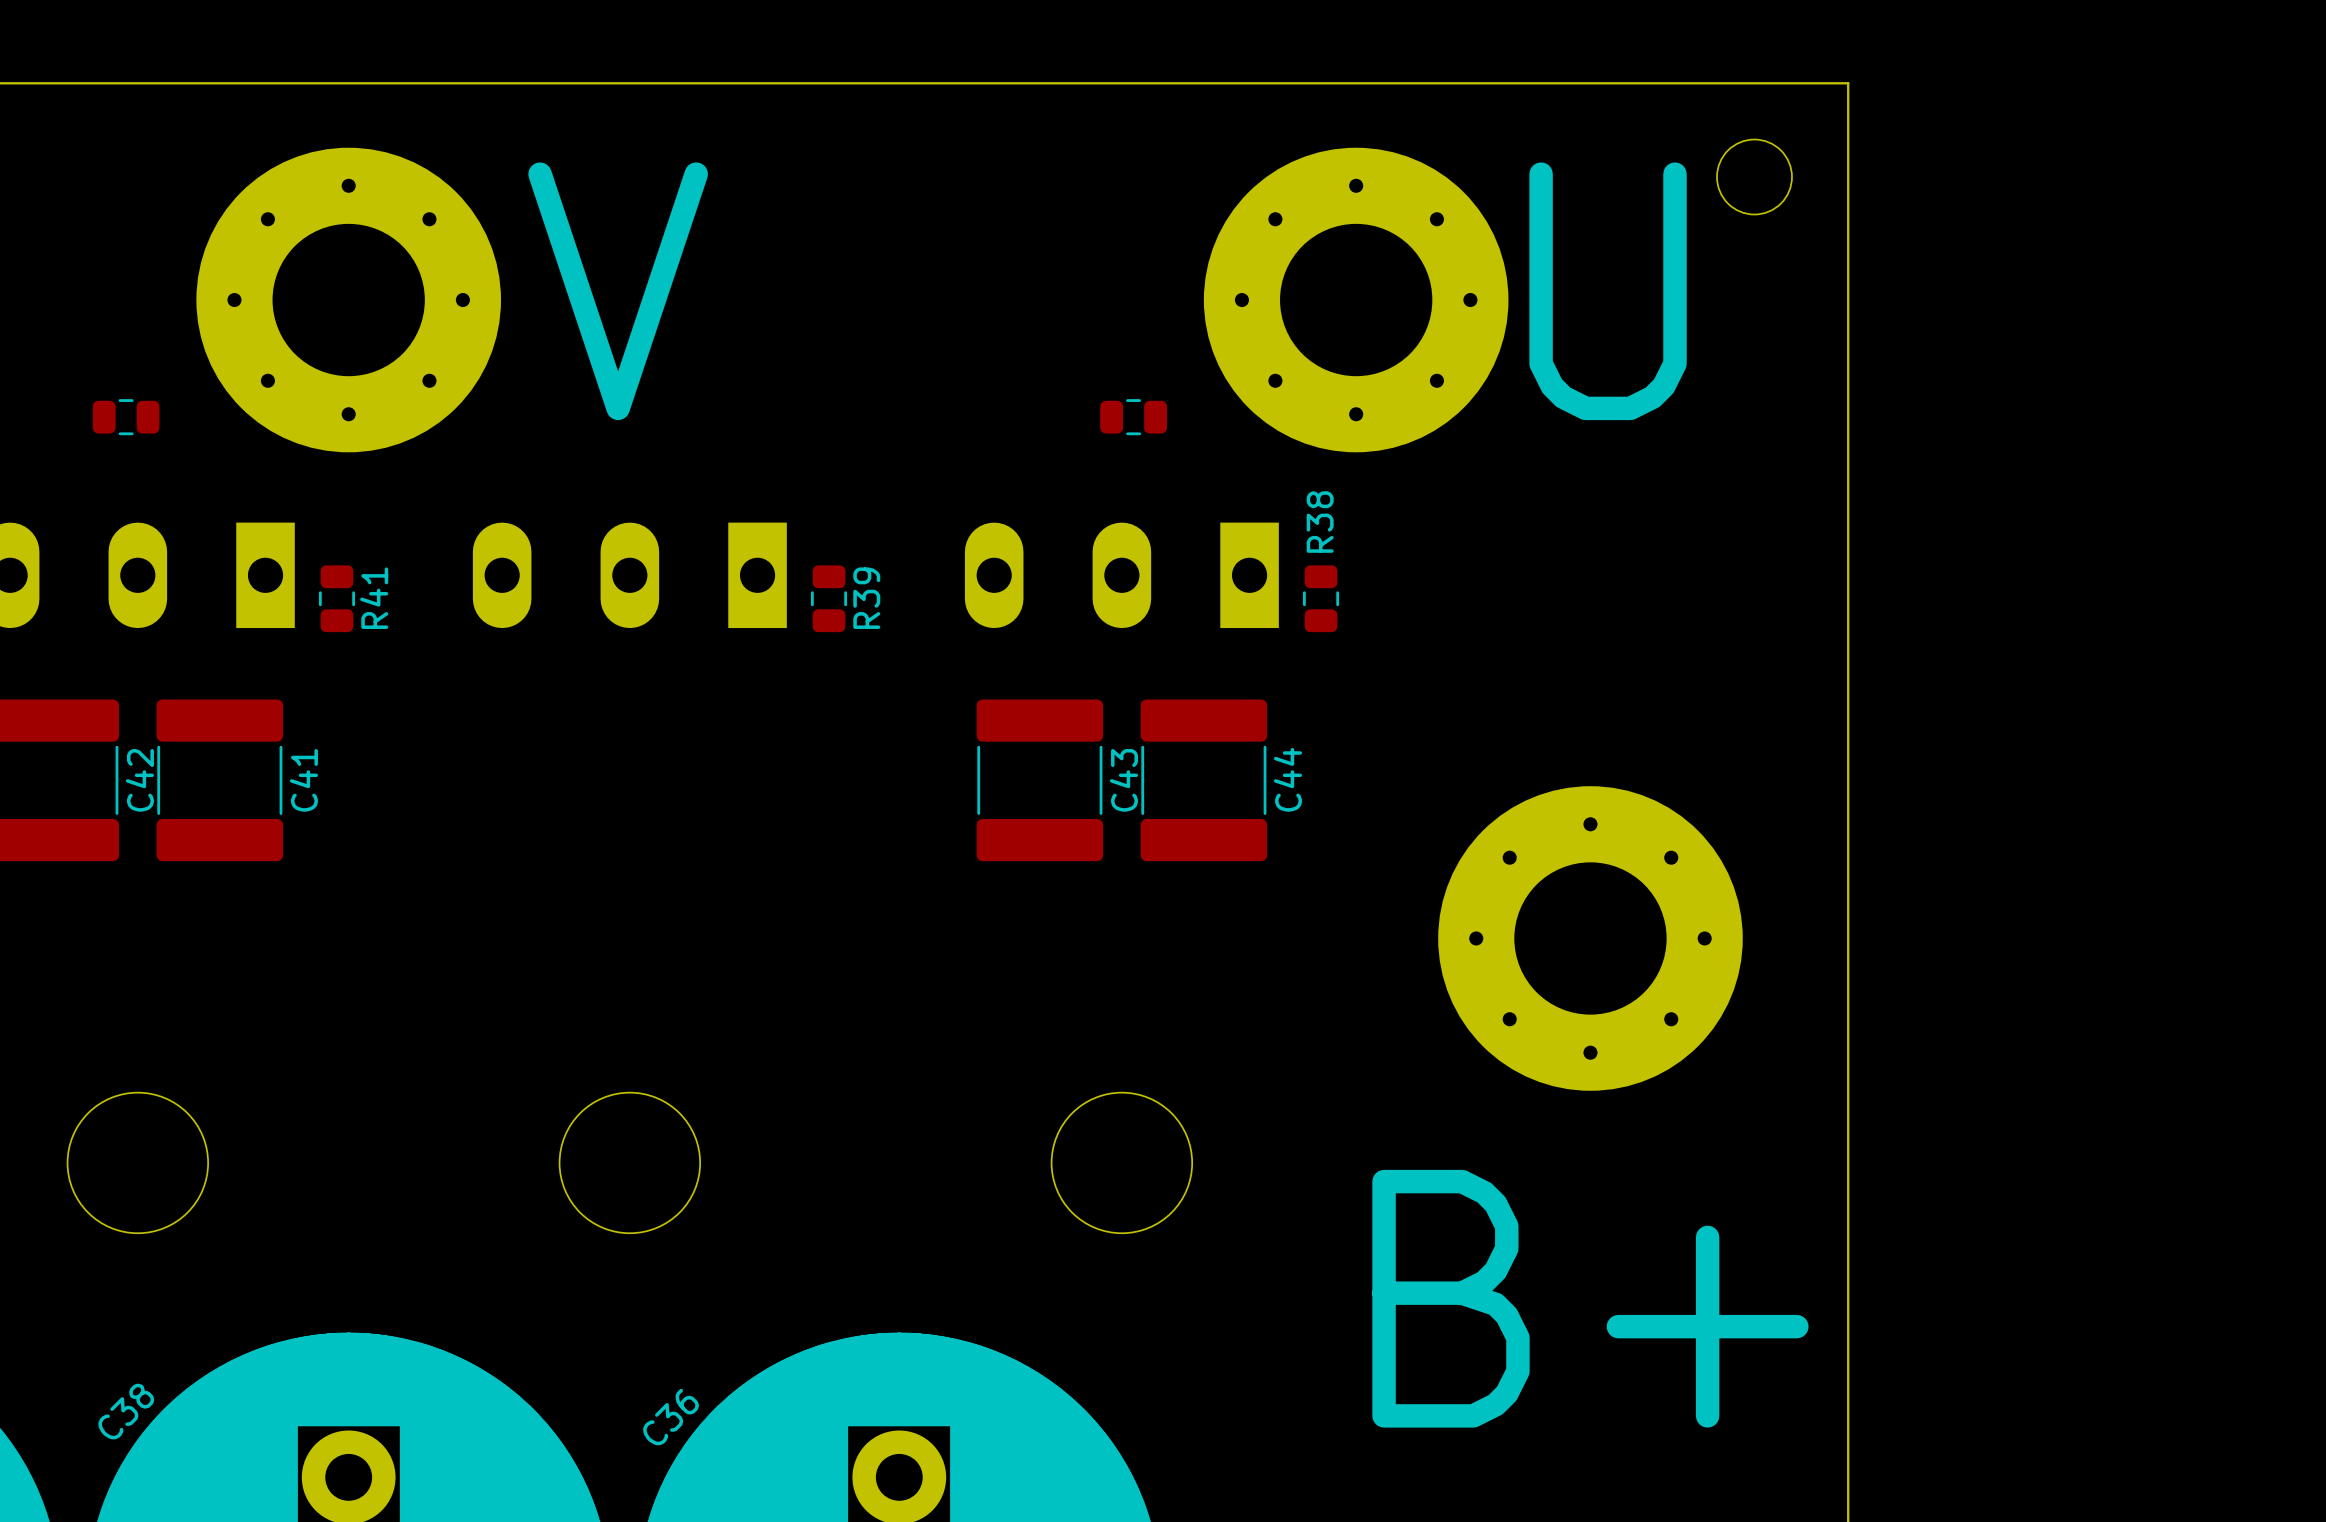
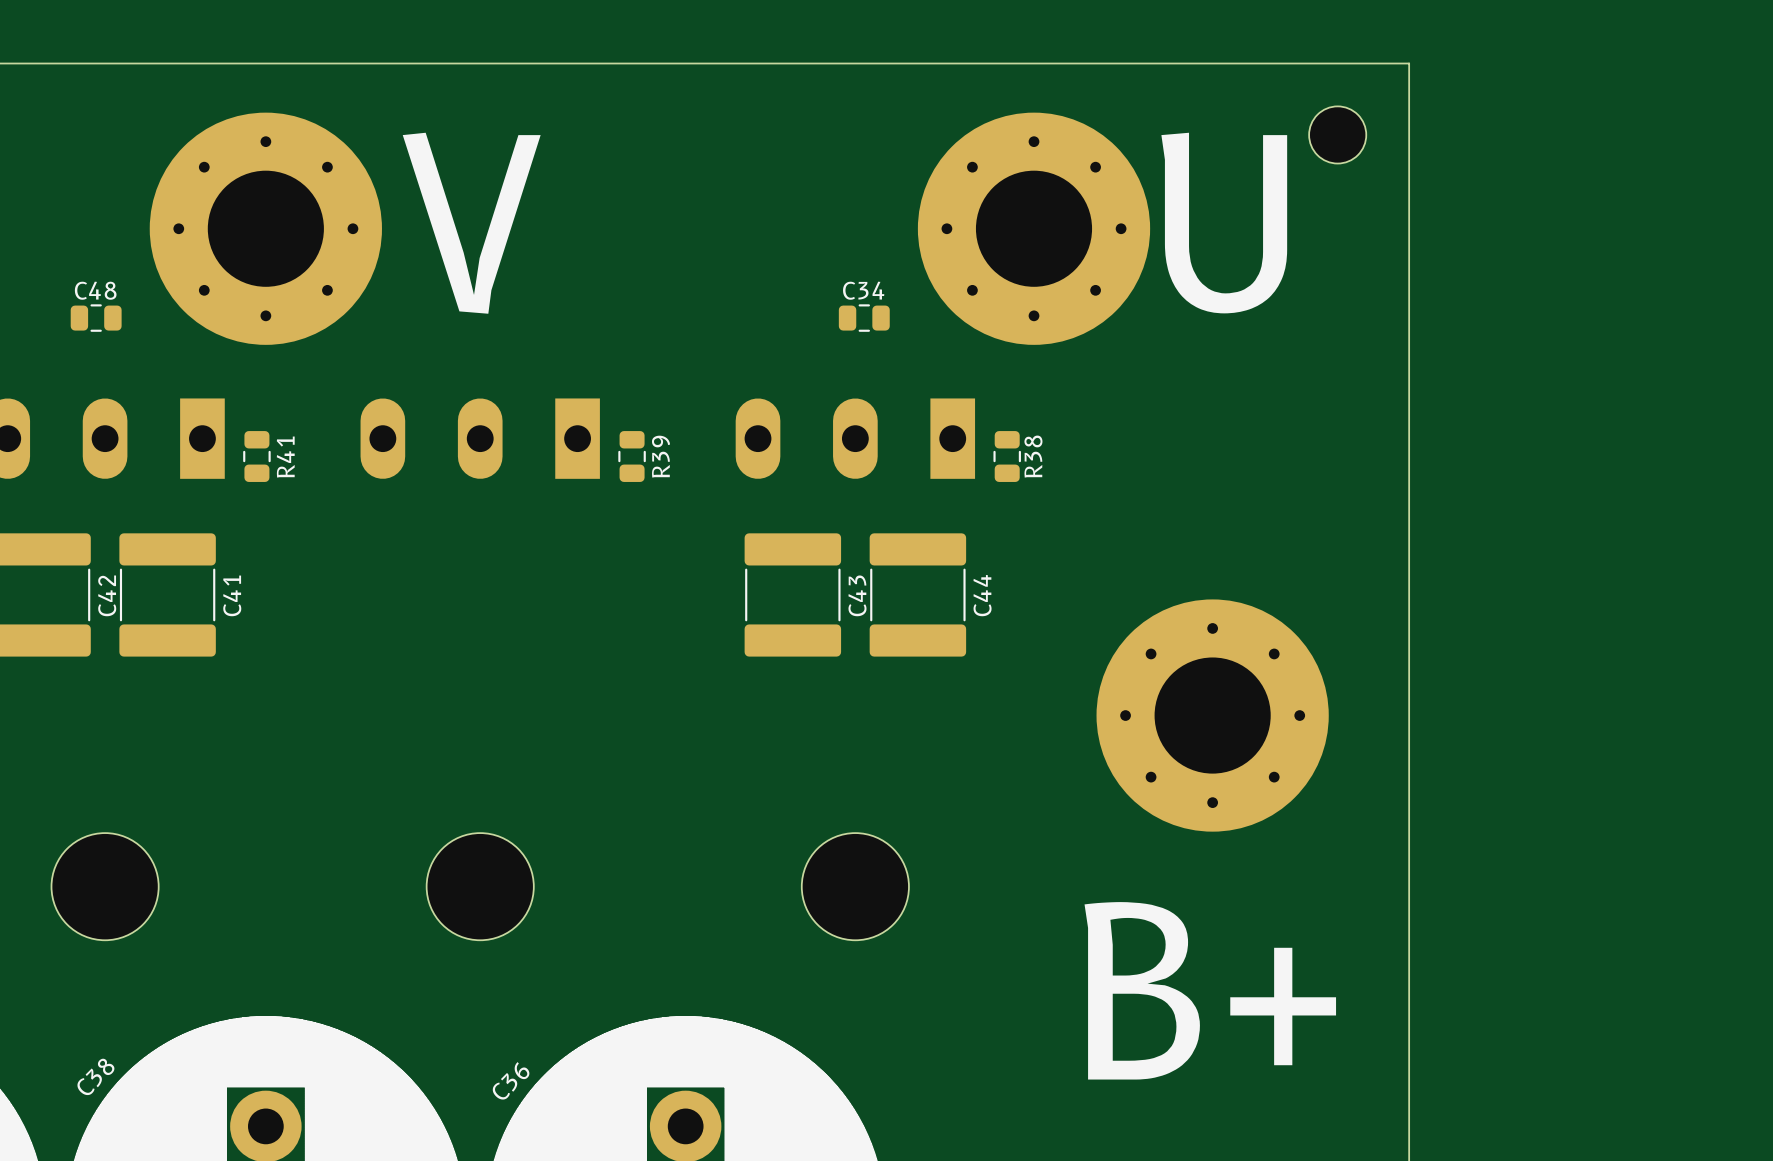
C48 name: none -> C48 (95, 290)
C34 name: none -> C34 (863, 290)
R38 name position: R38 (1320, 522) -> R38 (1033, 456)

